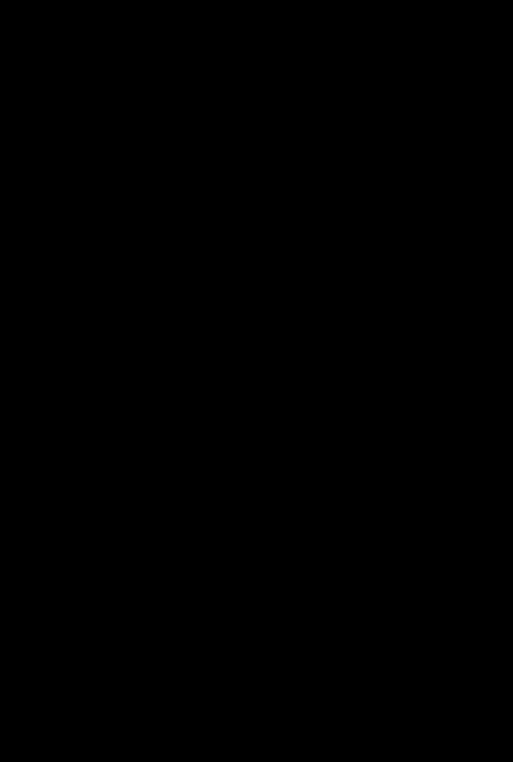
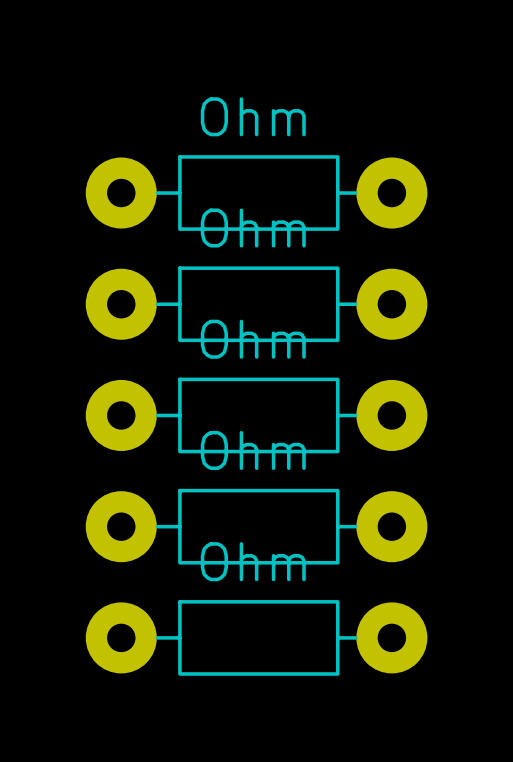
part: none -> (256, 193)
part: none -> (256, 304)
part: none -> (256, 415)
part: none -> (256, 526)
part: none -> (256, 637)

